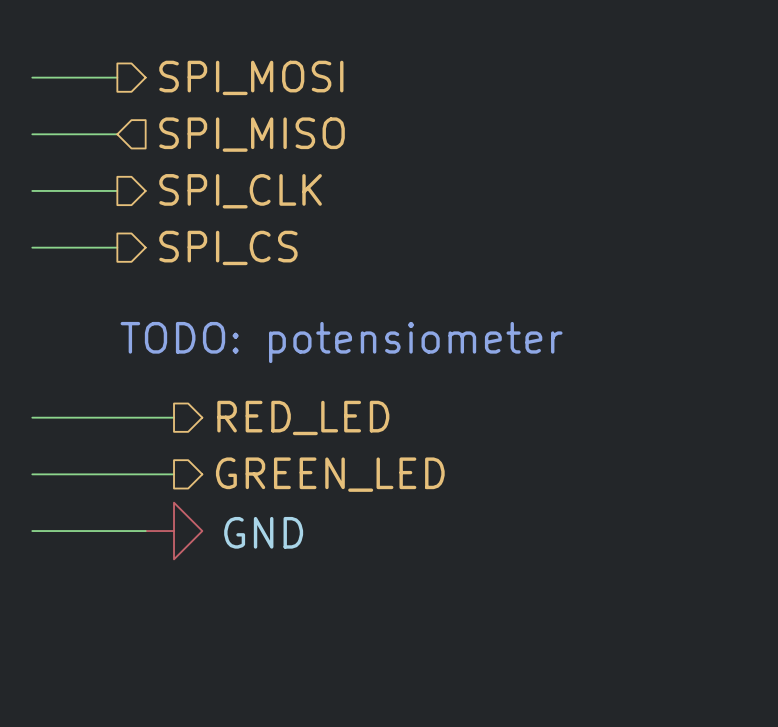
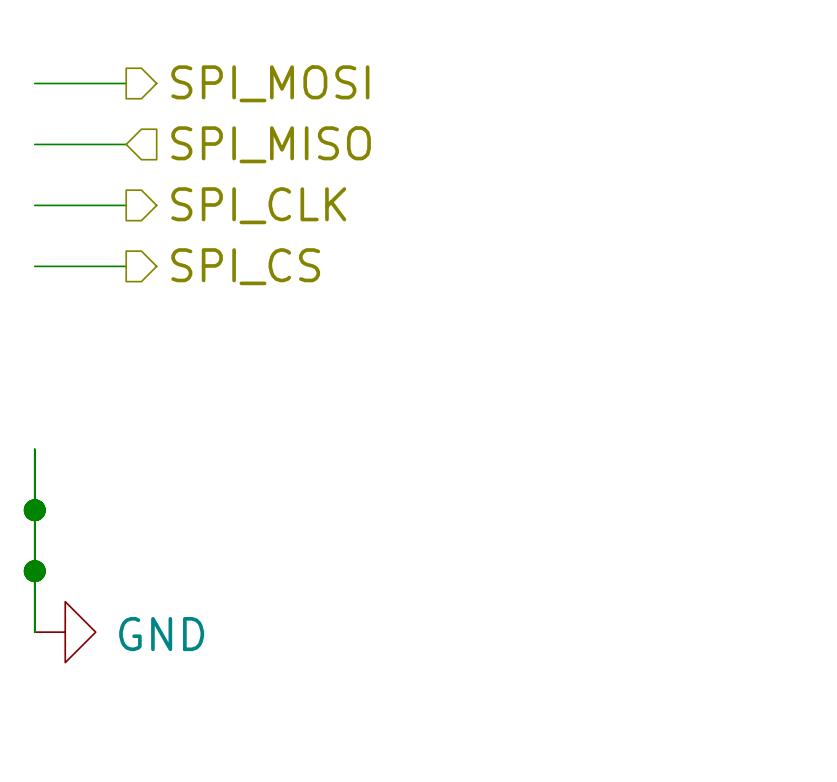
text: TODO: potensiometer (341, 342) -> none
wire: (32, 417) (174, 417) -> (34, 449) (34, 632)
hierarchical label: RED_LED (303, 417) -> none
wire: (32, 474) (174, 474) -> none
junction: none -> (34, 510)
hierarchical label: GREEN_LED (330, 474) -> none
wire: (32, 531) (145, 531) -> none
junction: none -> (34, 571)
power symbol position: GND (174, 531) -> GND (65, 632)

